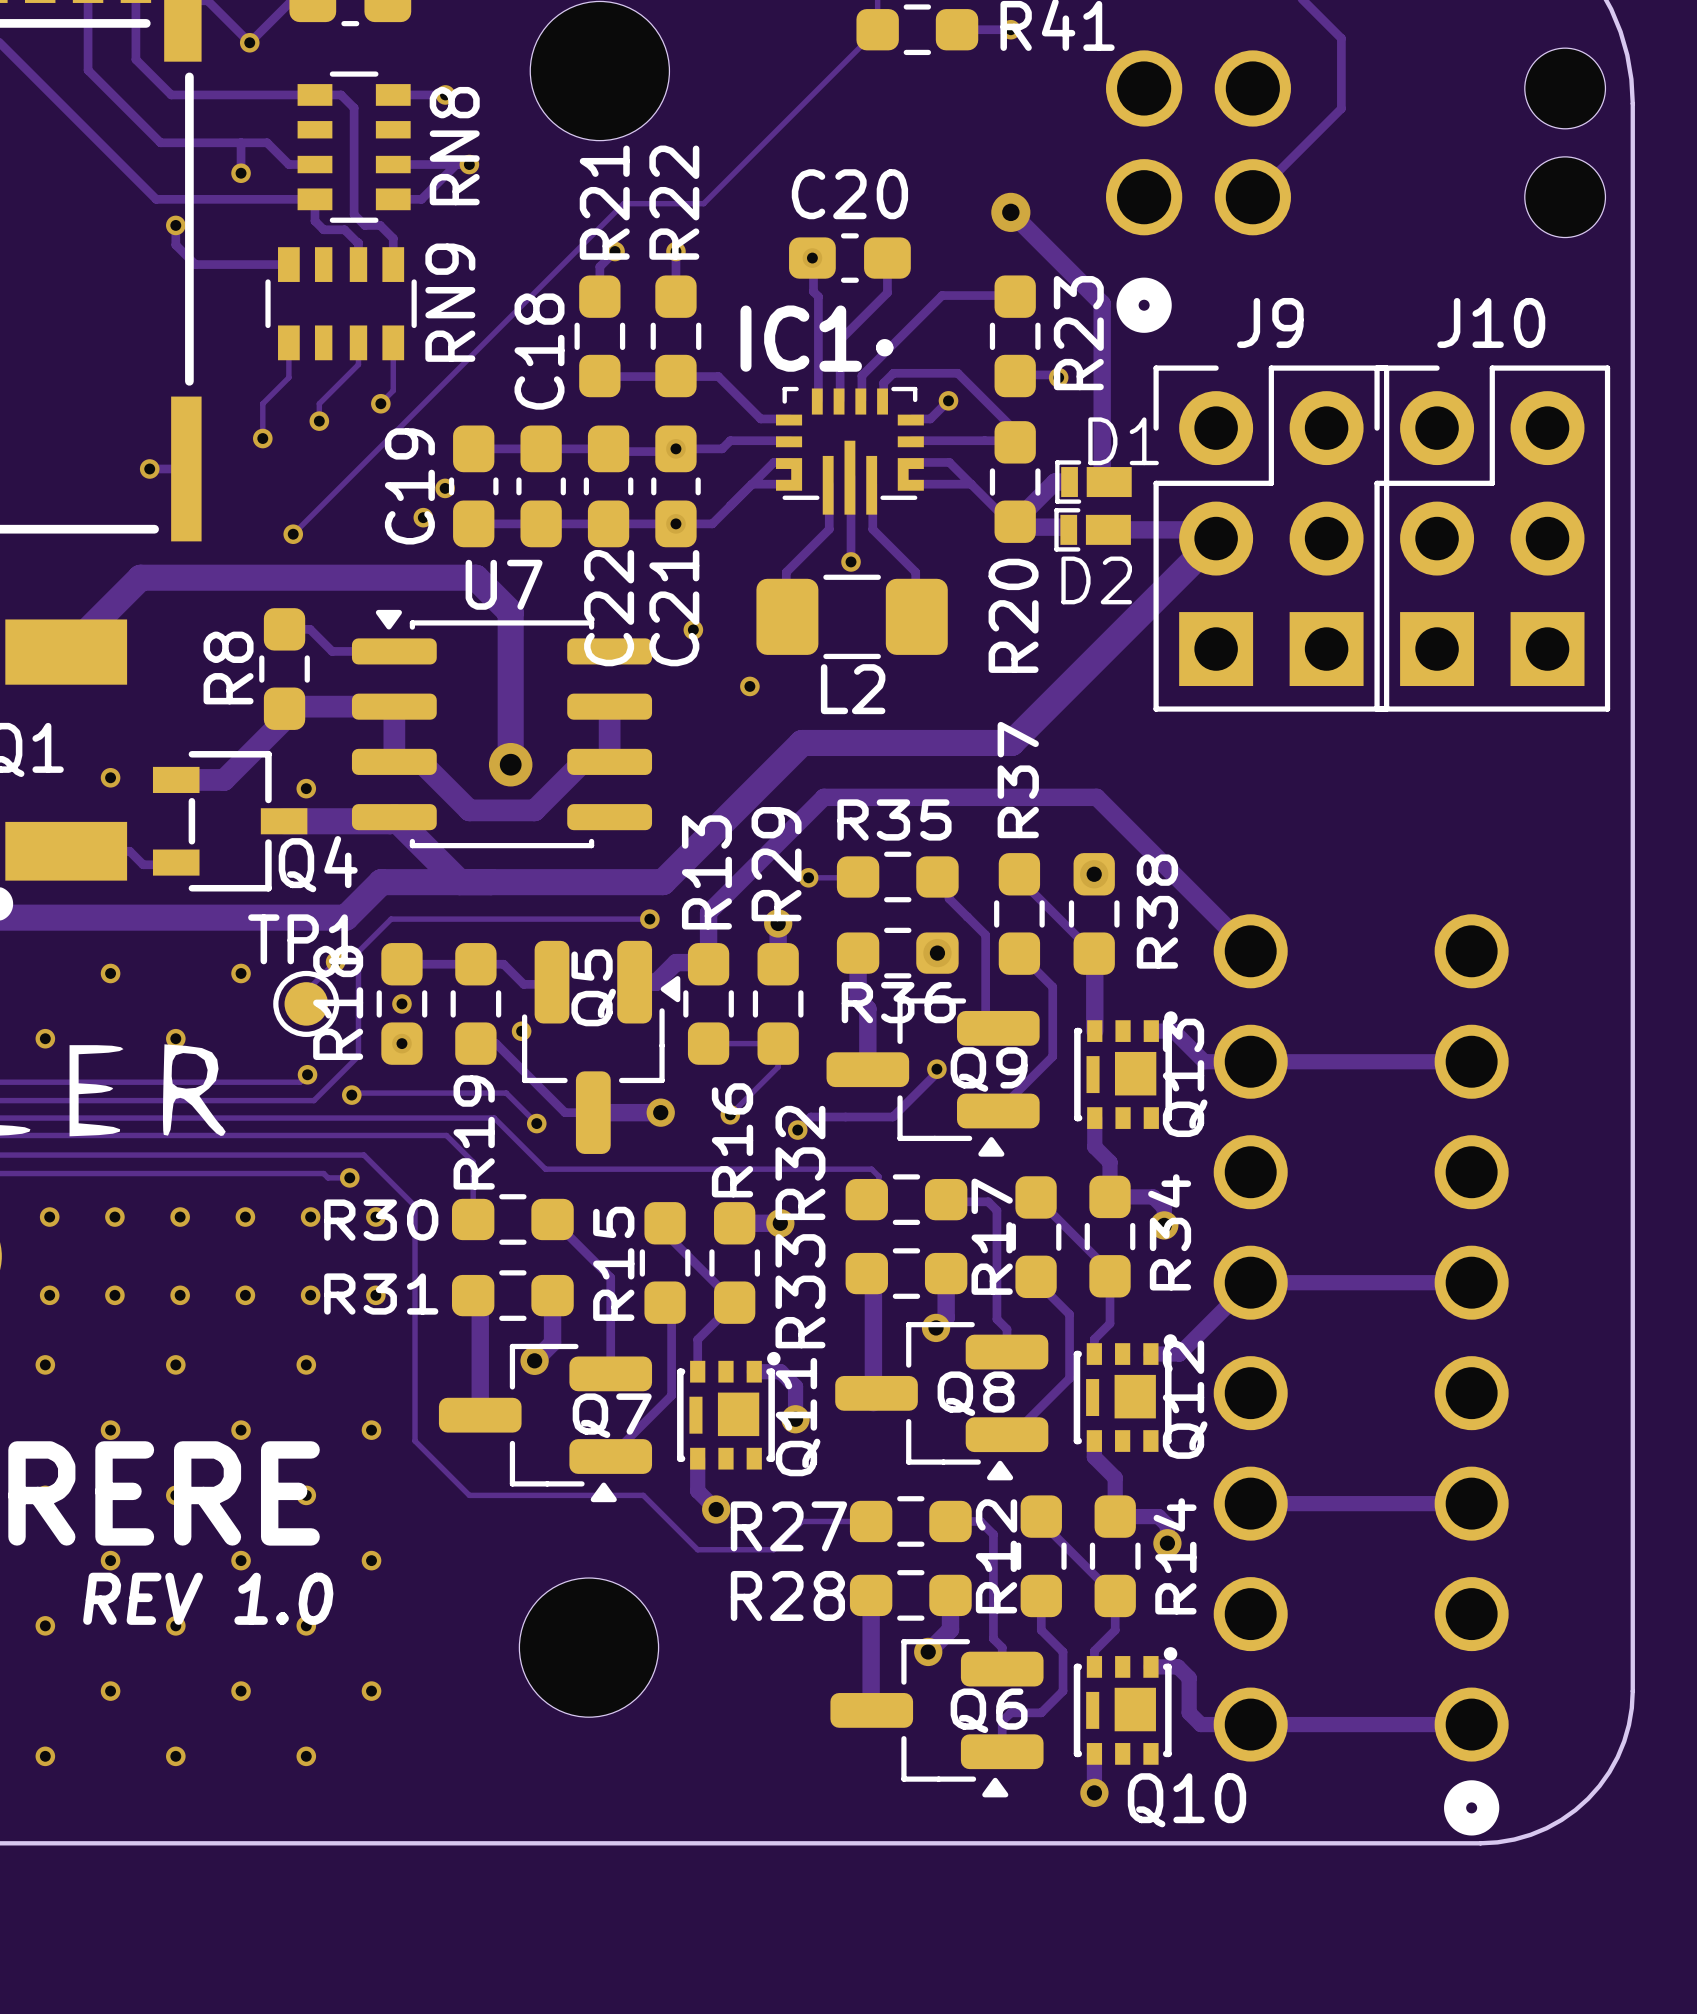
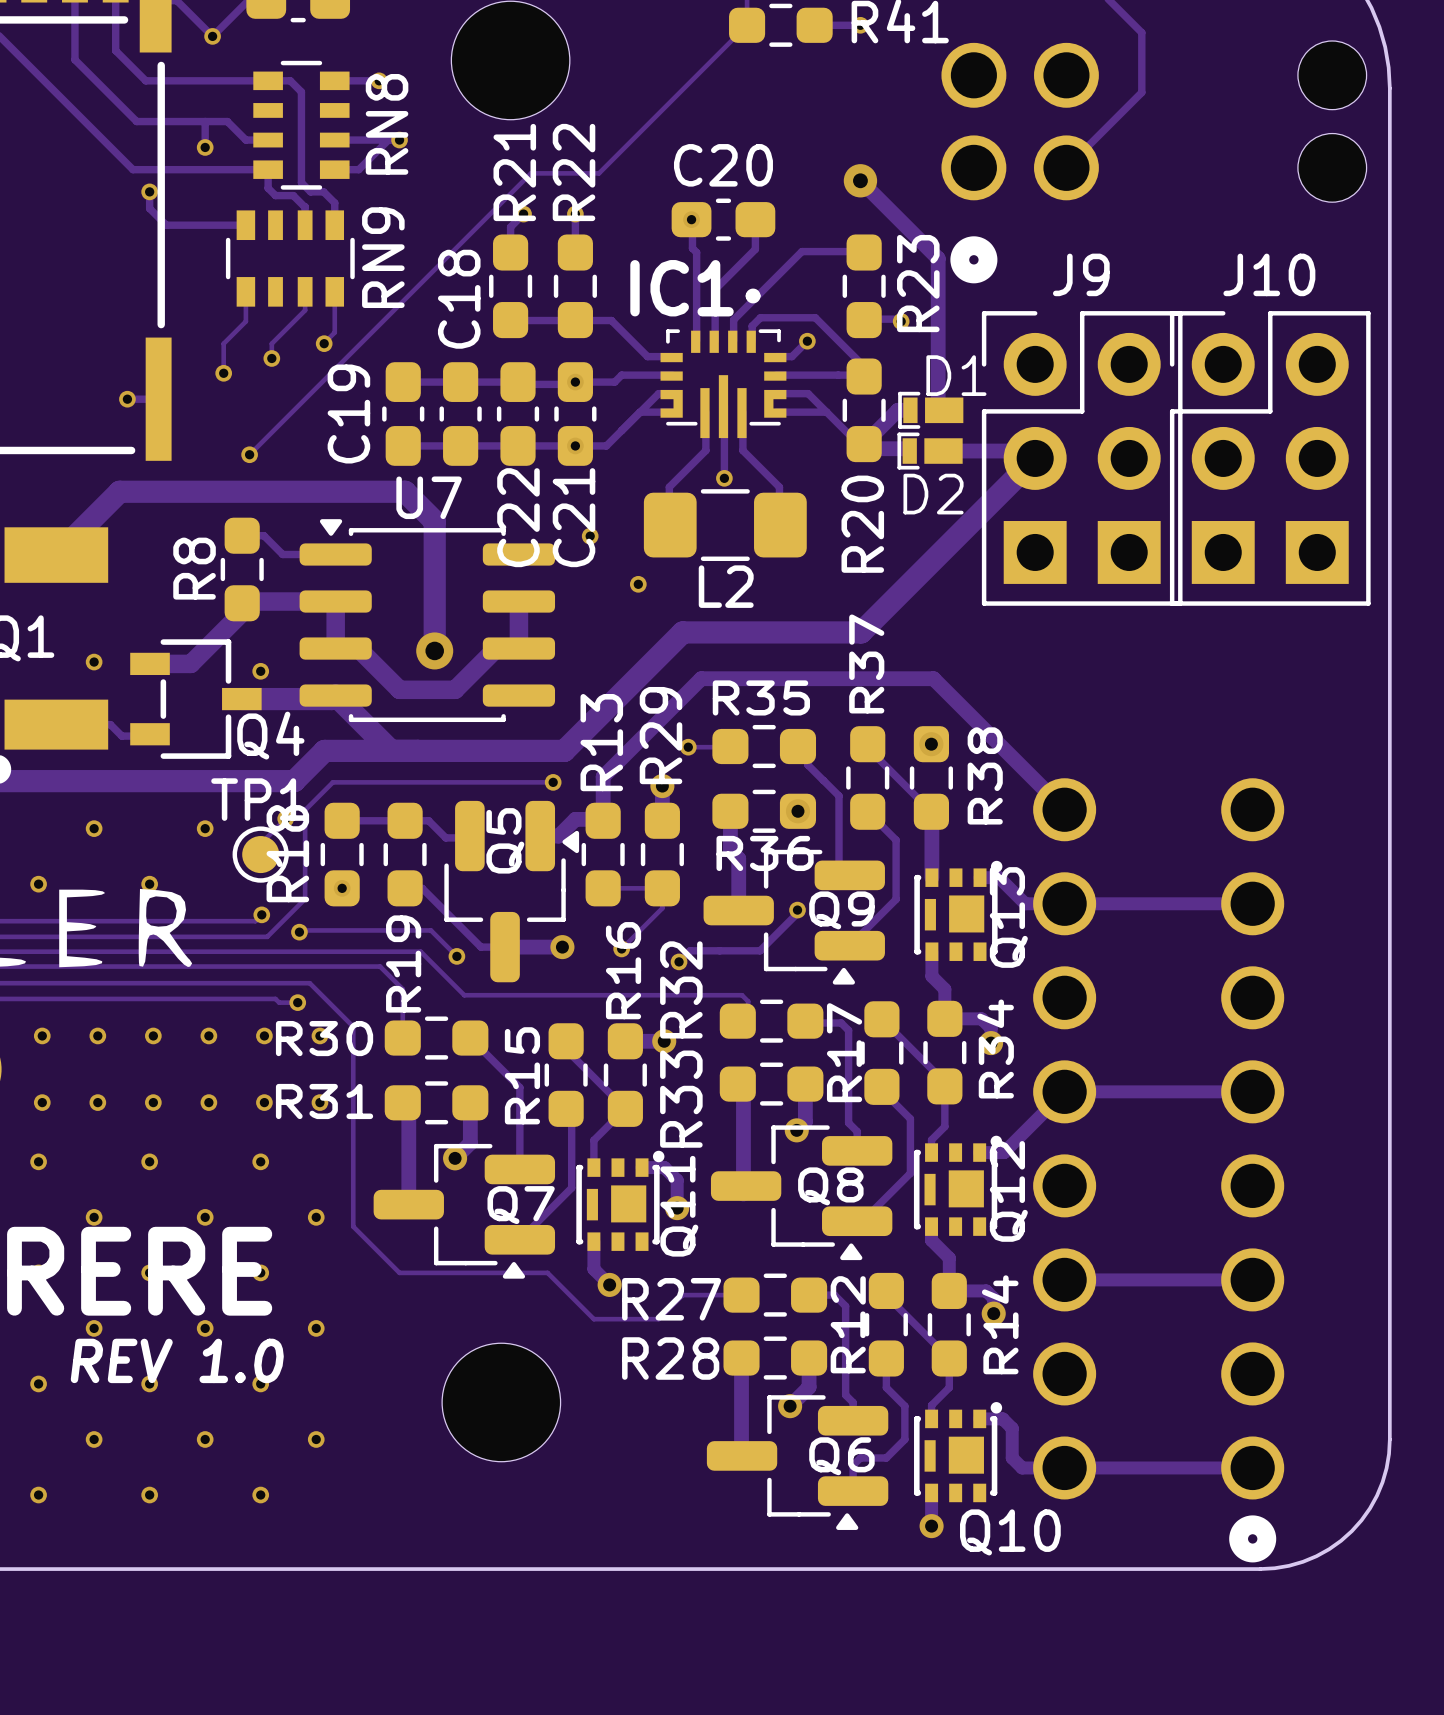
via: (445, 488) -> none
via: (423, 517) -> none
via: (401, 1003) -> none
via: (521, 1031) -> none

